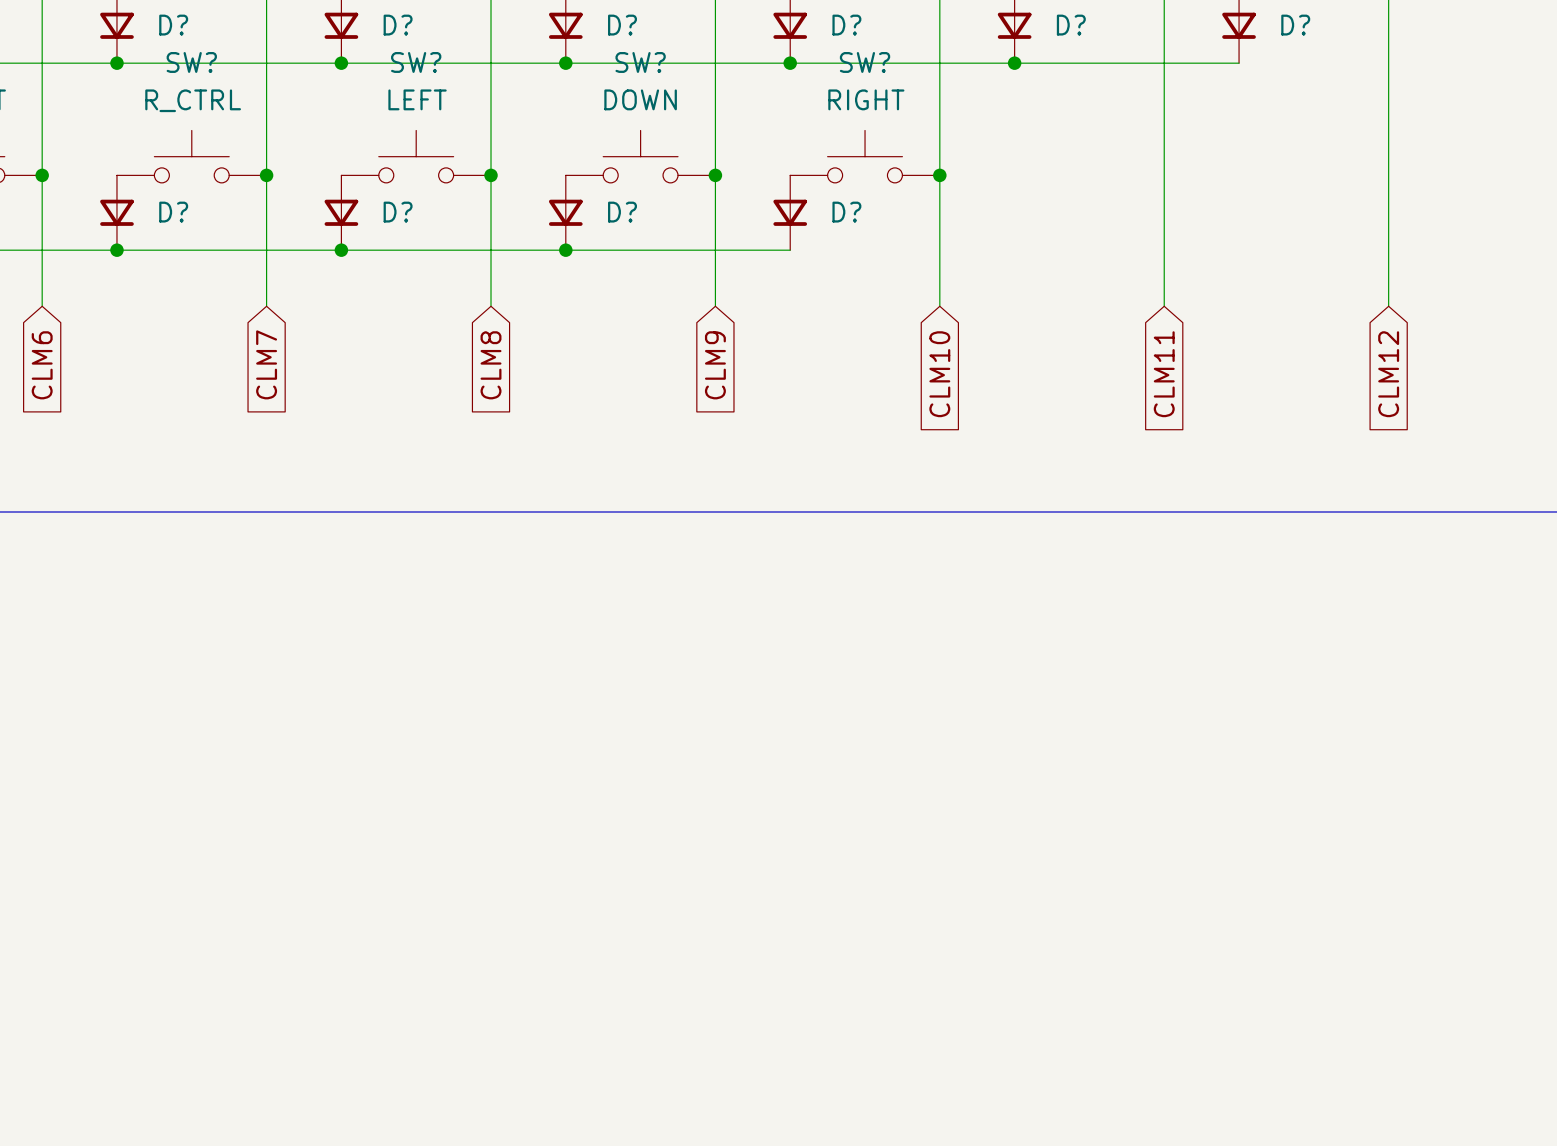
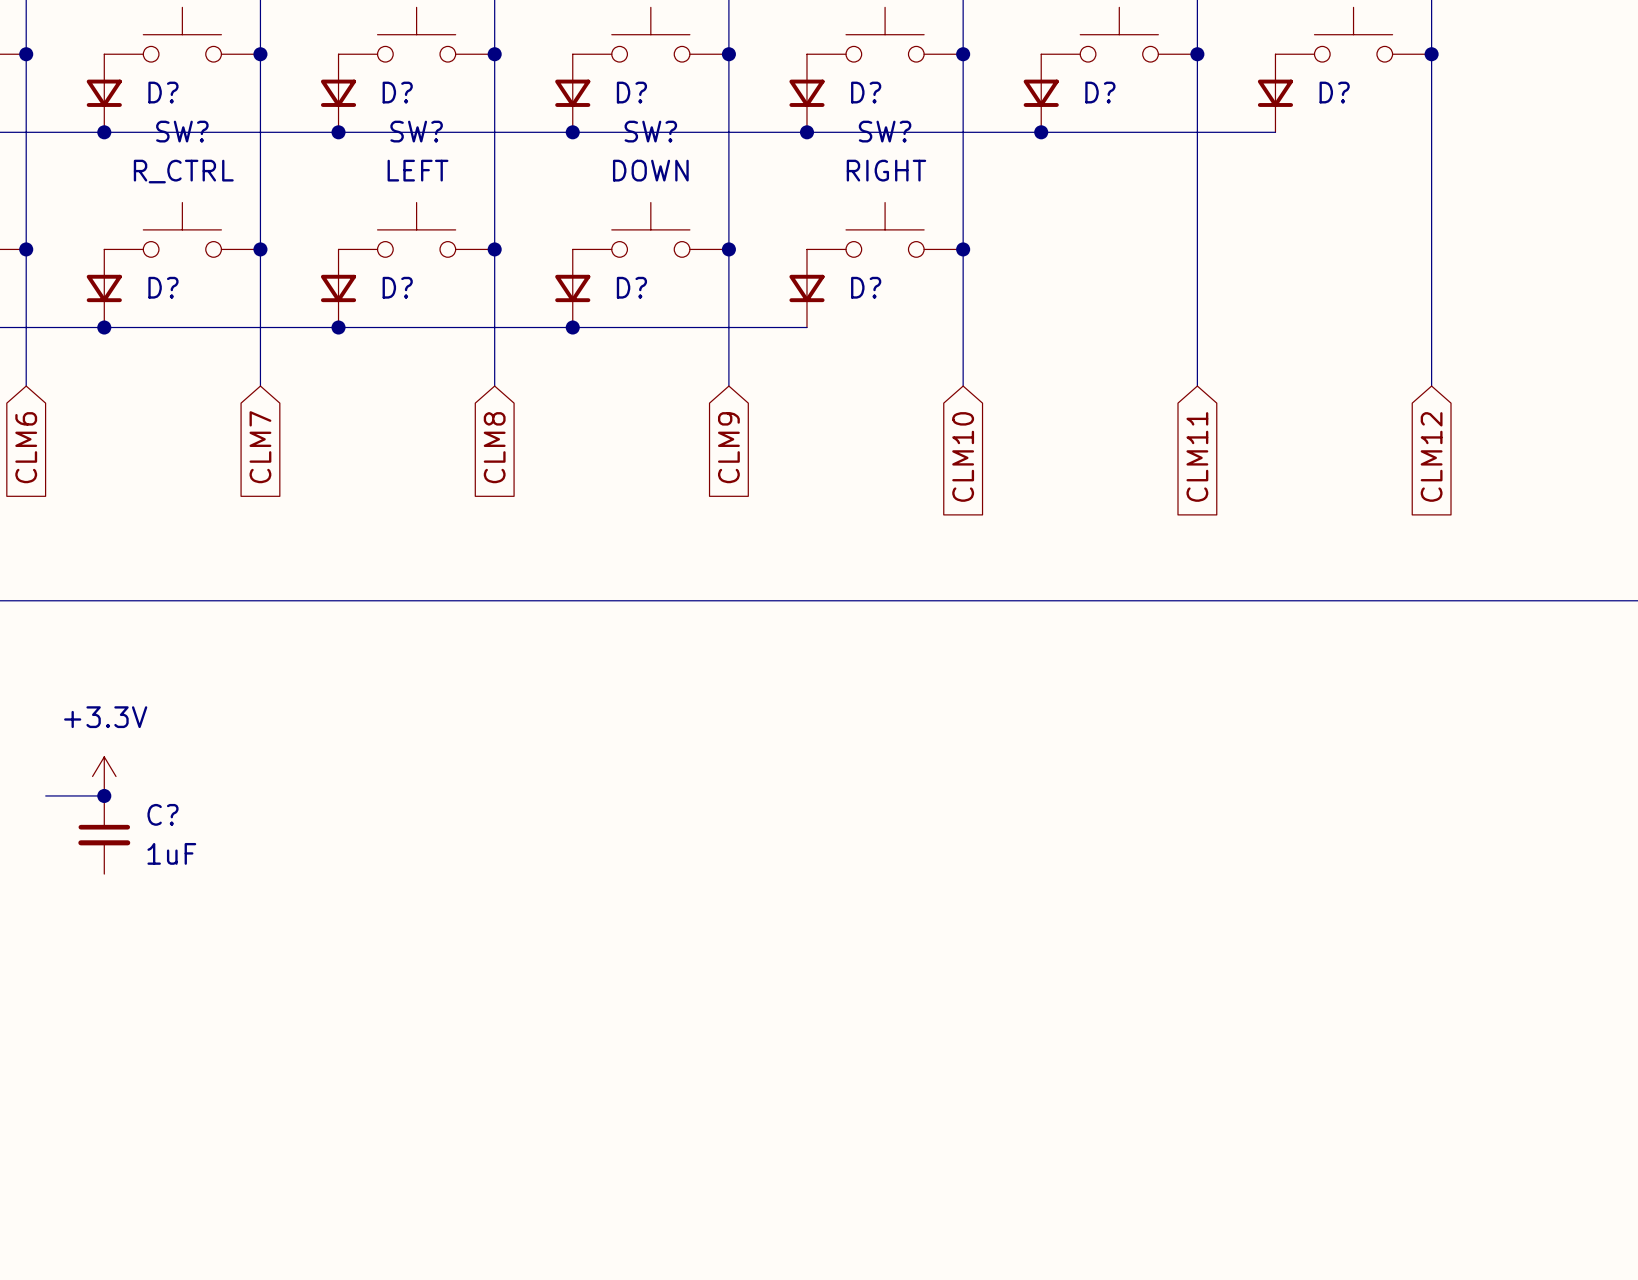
power symbol: none -> +3.3V (104, 776)
wire: none -> (45, 795) (104, 795)
junction: none -> (104, 795)
C?: none -> 1uF (104, 835)

